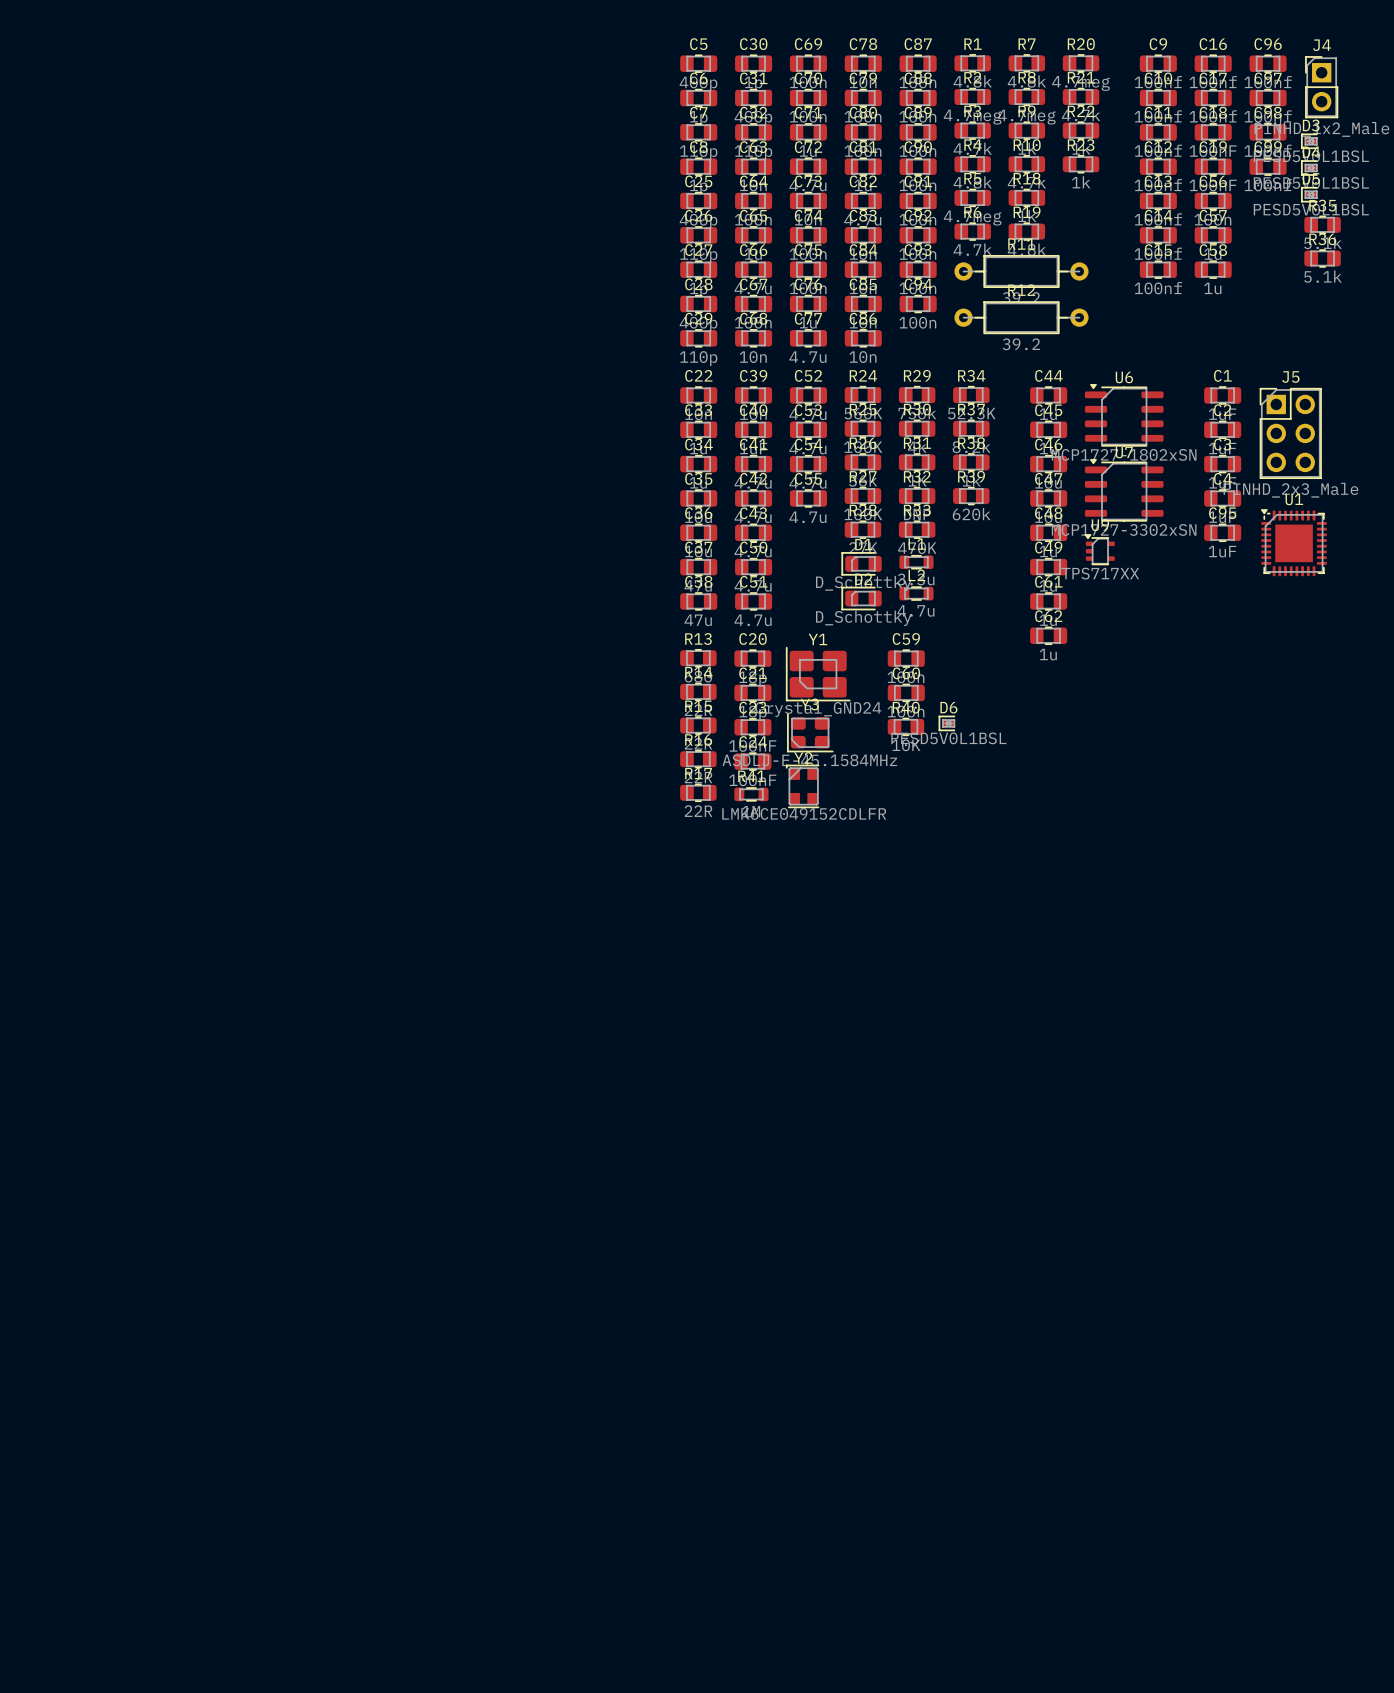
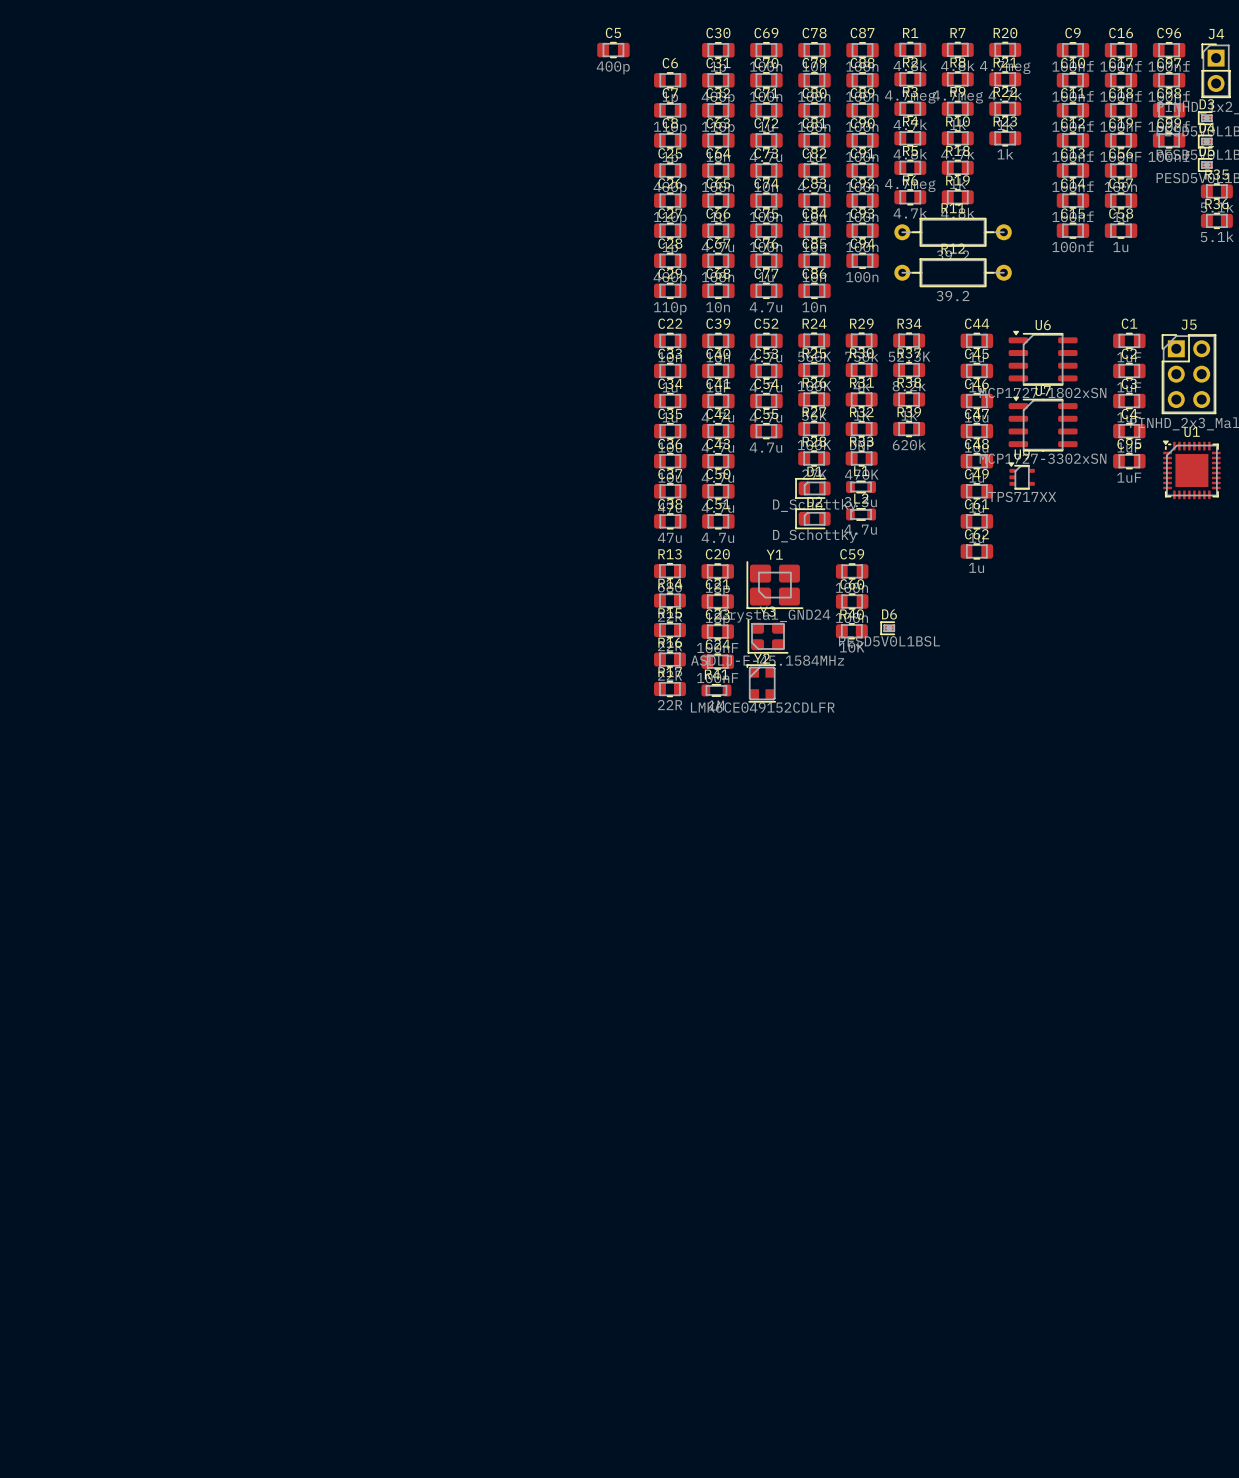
C5 position: (698, 63) -> (613, 50)

